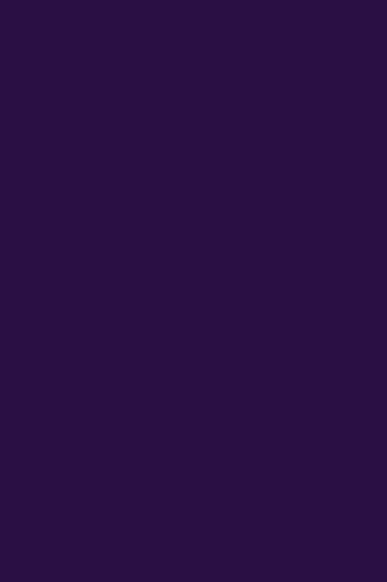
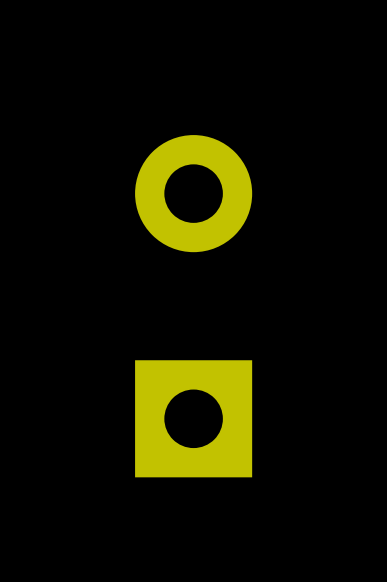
part: none -> (193, 306)

